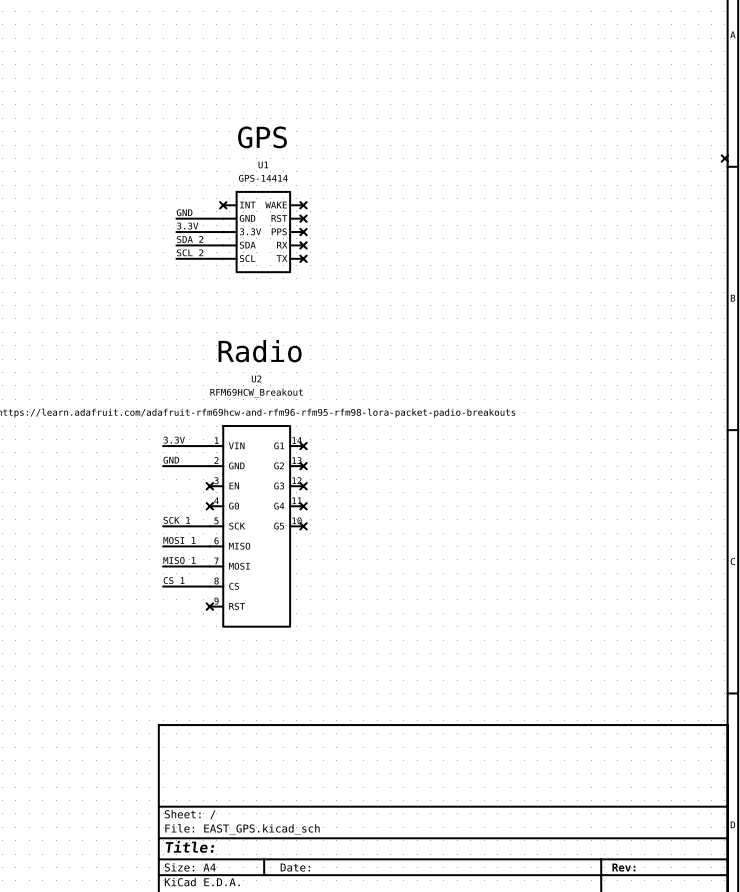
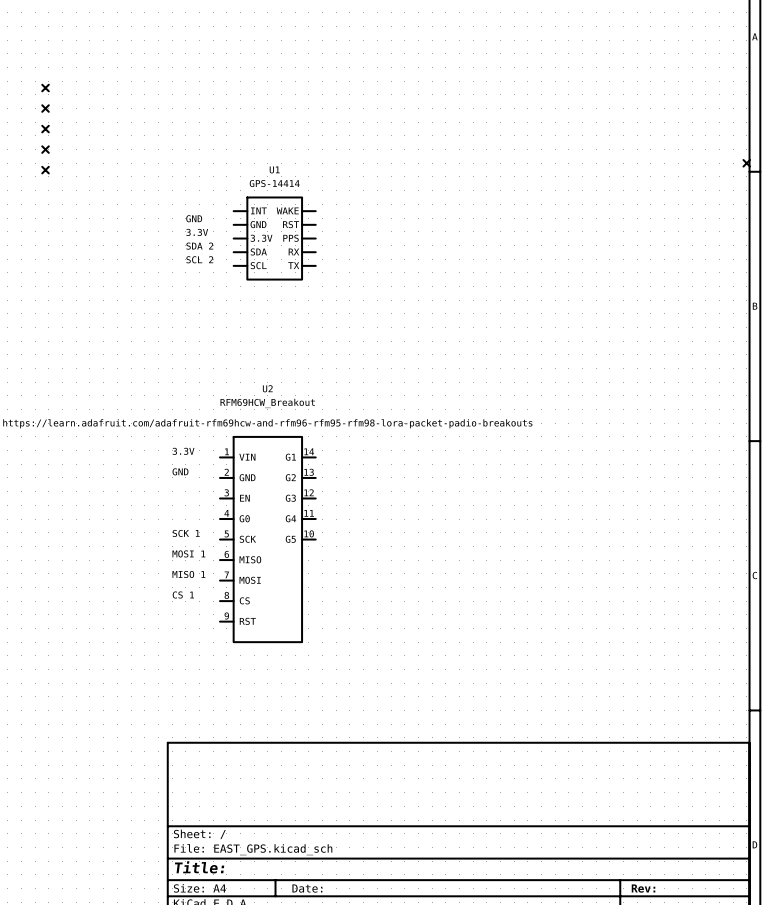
no-connect mark: none -> (45, 88)
no-connect mark: none -> (45, 108)
no-connect mark: none -> (45, 129)
text: GPS (262, 137) -> none
no-connect mark: none -> (45, 149)
no-connect mark: none -> (45, 170)
no-connect mark: (223, 205) -> none
no-connect mark: (303, 205) -> none
wire: (176, 218) (223, 218) -> none
no-connect mark: (303, 218) -> none
wire: (176, 232) (223, 232) -> none
no-connect mark: (303, 232) -> none
wire: (176, 245) (223, 245) -> none
no-connect mark: (303, 245) -> none
wire: (176, 258) (223, 258) -> none
no-connect mark: (303, 258) -> none
text: Radio (260, 351) -> none
wire: (163, 446) (209, 446) -> none
no-connect mark: (303, 446) -> none
wire: (163, 466) (209, 466) -> none
no-connect mark: (303, 466) -> none
no-connect mark: (209, 486) -> none
no-connect mark: (303, 486) -> none
no-connect mark: (209, 506) -> none
no-connect mark: (303, 506) -> none
wire: (163, 526) (209, 526) -> none
no-connect mark: (303, 526) -> none
wire: (163, 546) (209, 546) -> none
wire: (163, 566) (209, 566) -> none
wire: (163, 586) (209, 586) -> none
no-connect mark: (209, 606) -> none

